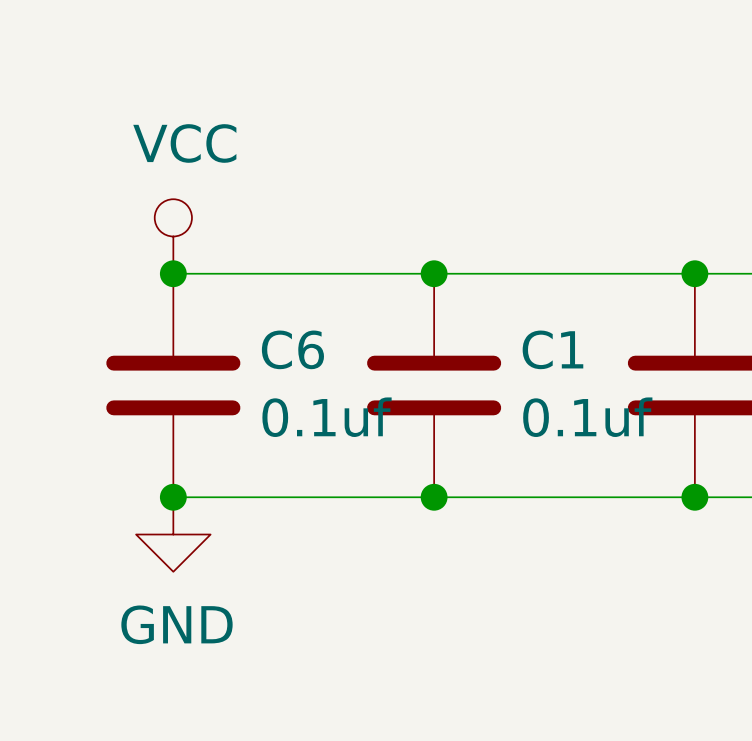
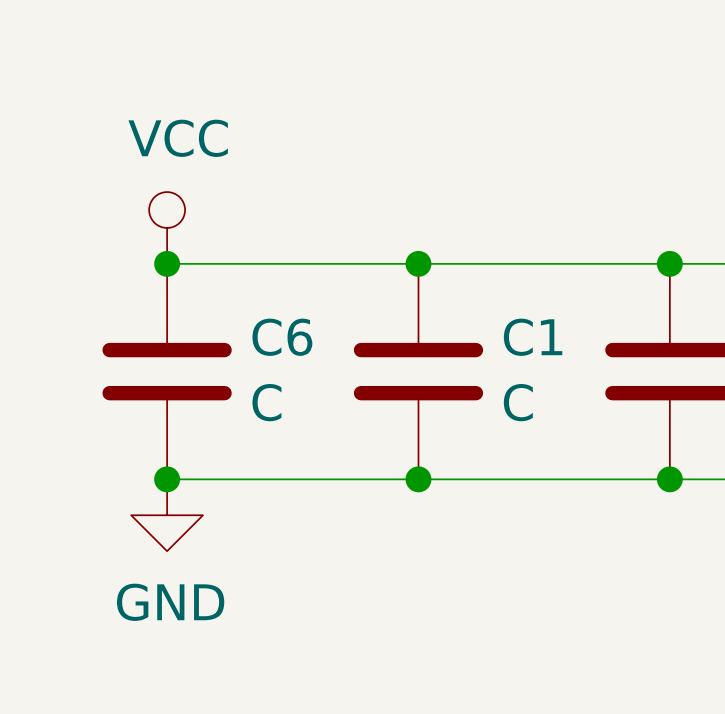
C6 value: 0.1uf (327, 417) -> C (266, 402)
C1 value: 0.1uf (587, 417) -> C (518, 402)

